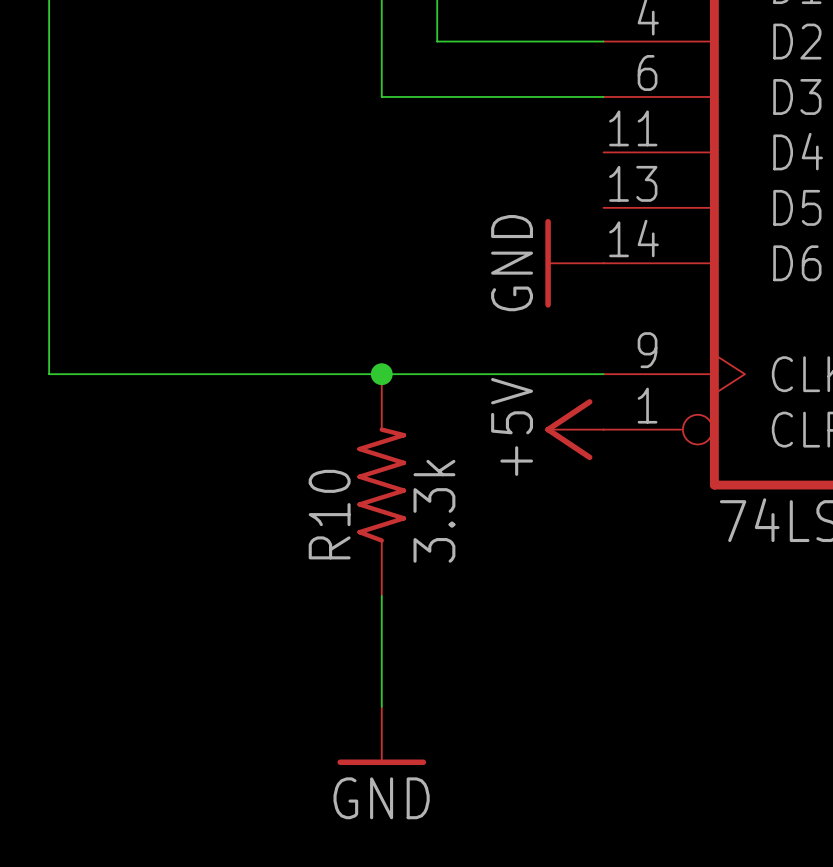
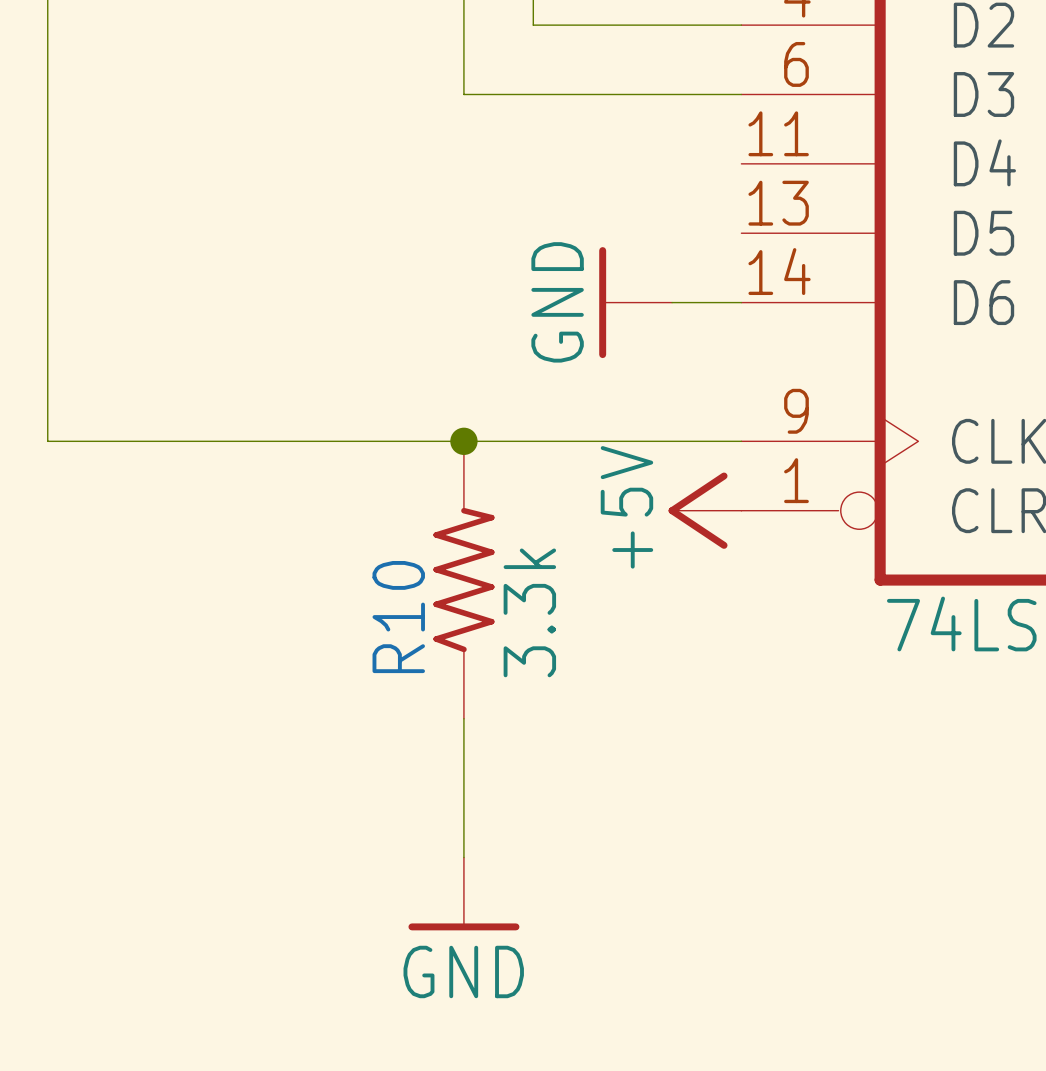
power symbol position: GND (574, 263) -> GND (635, 302)

